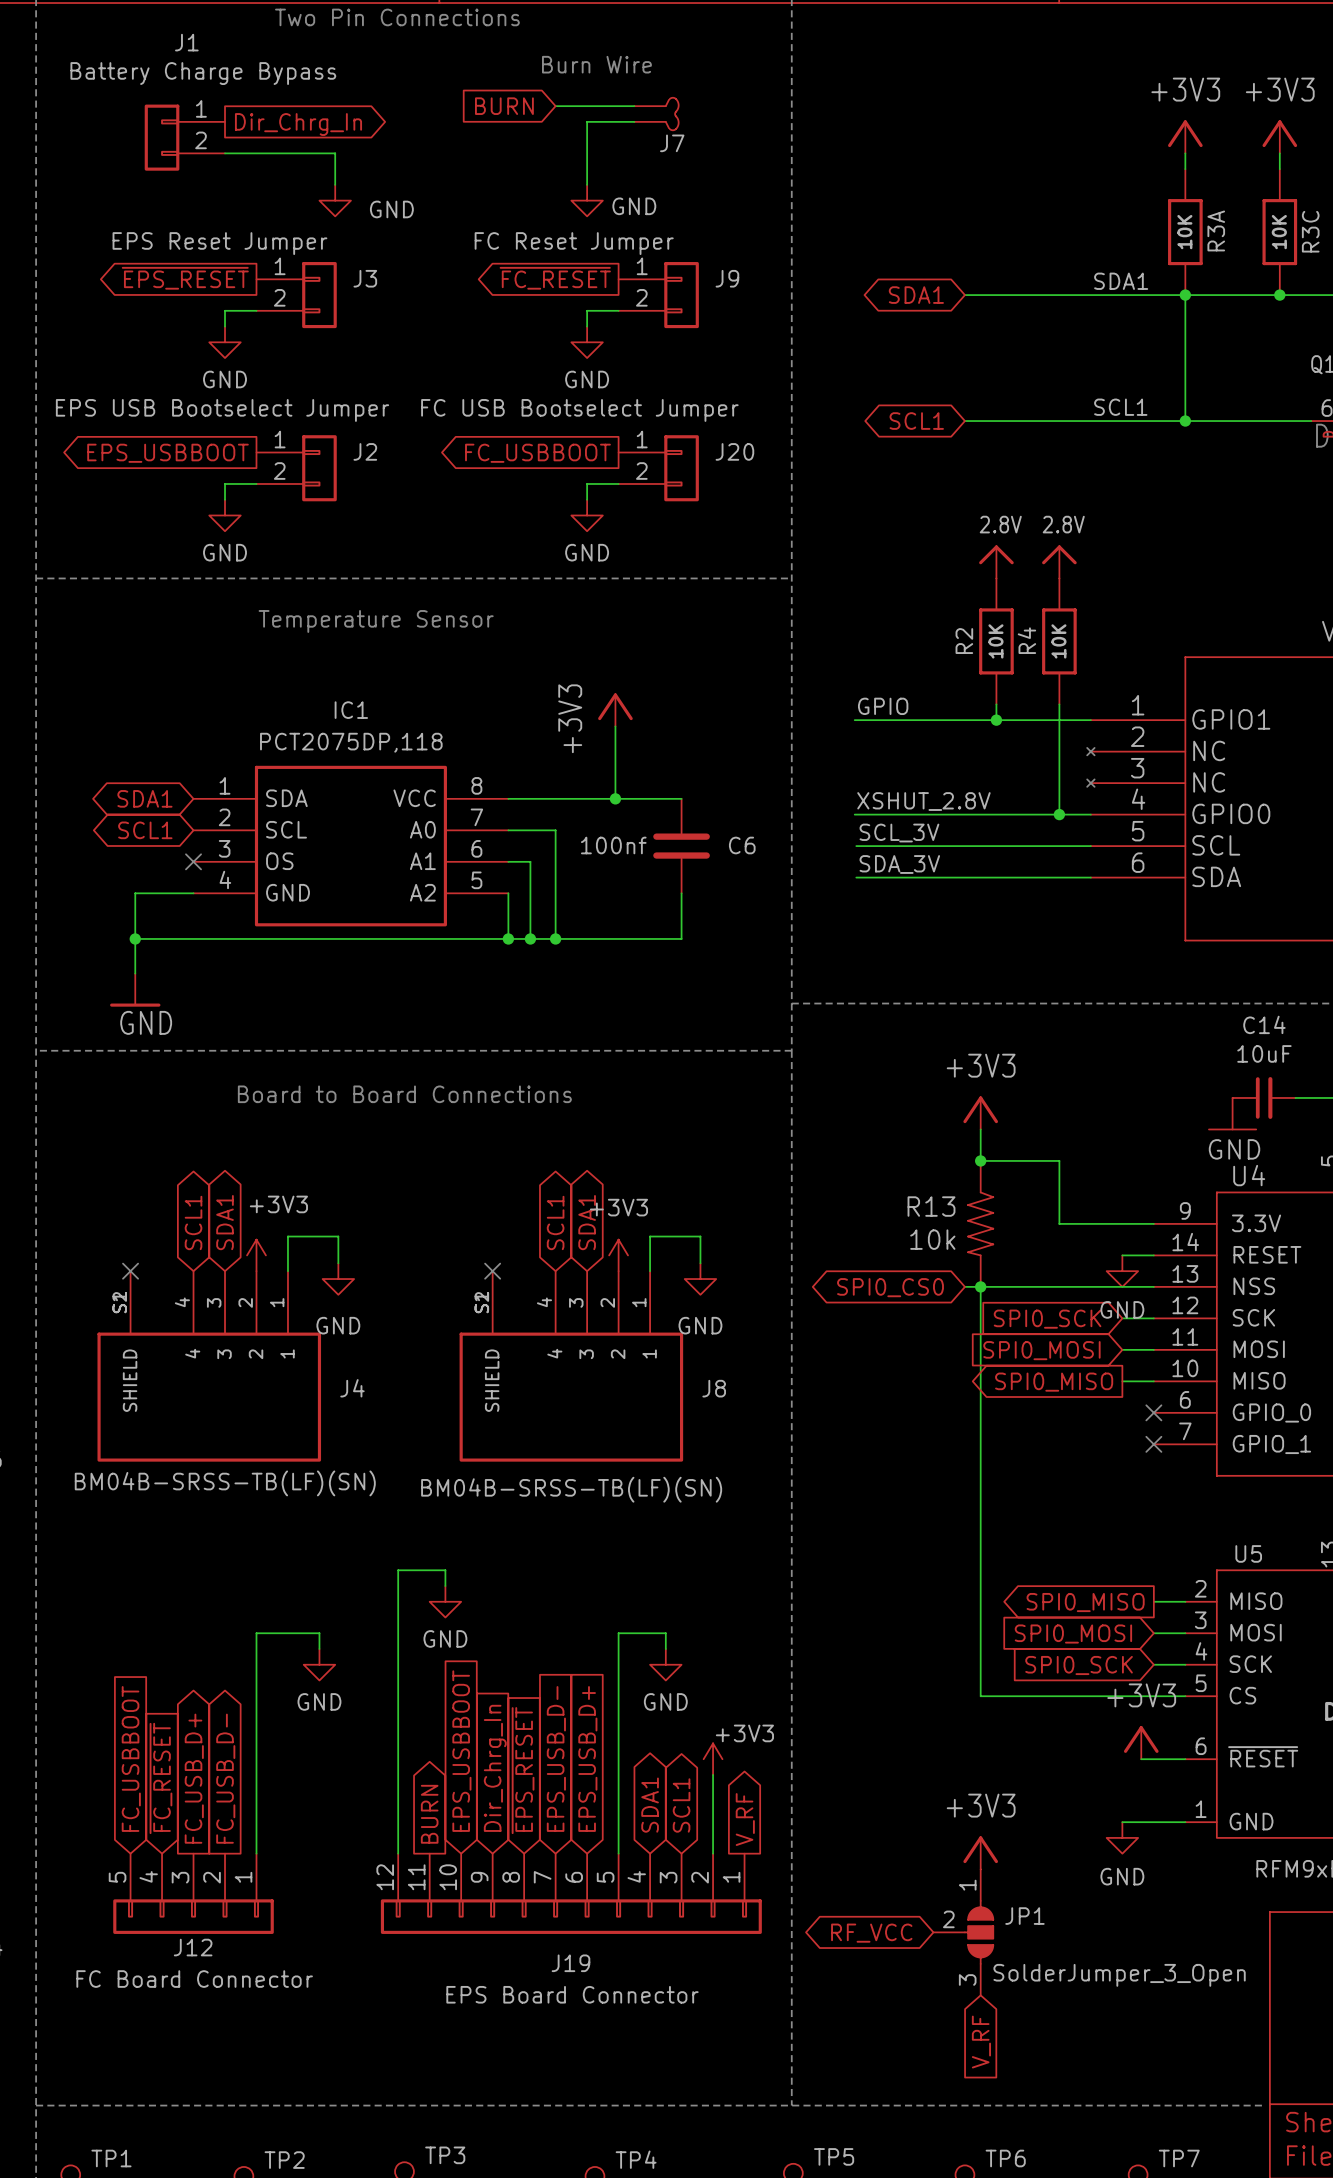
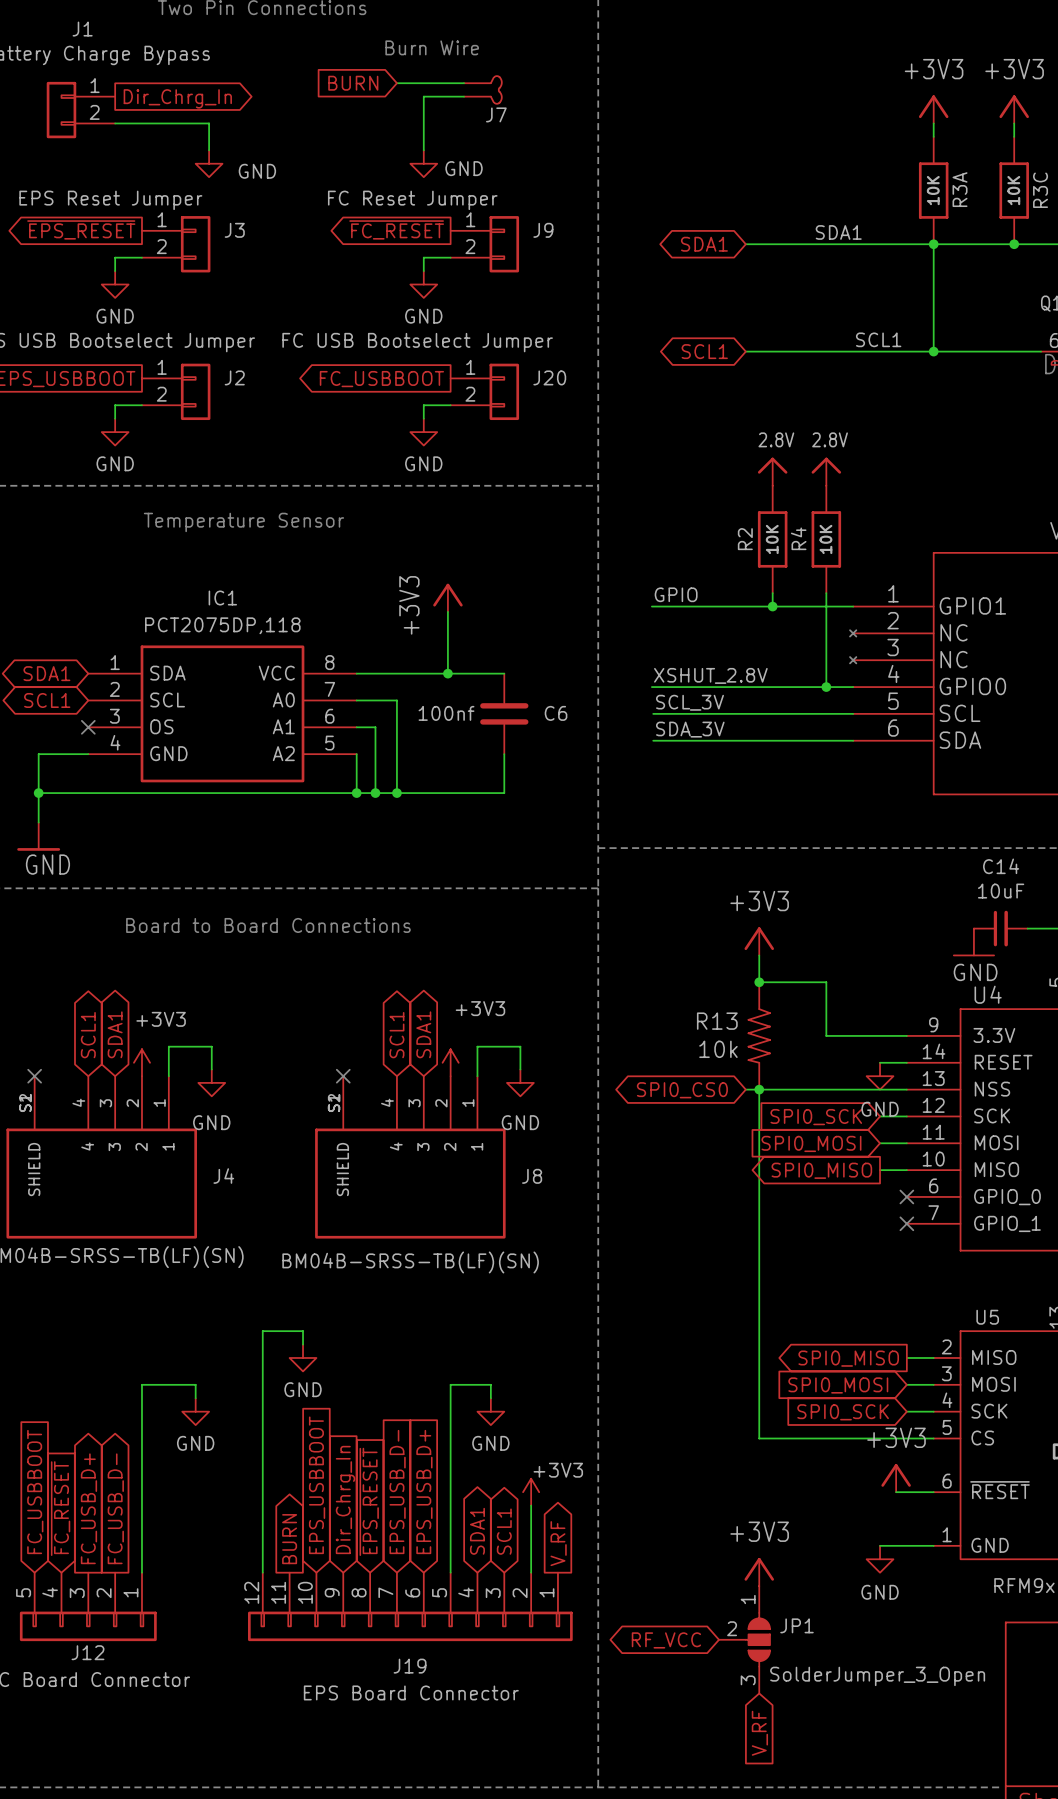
label position: SDA1 (1121, 281) -> SDA1 (838, 232)
power symbol text position: +3V3 (618, 1207) -> +3V3 (480, 1008)

